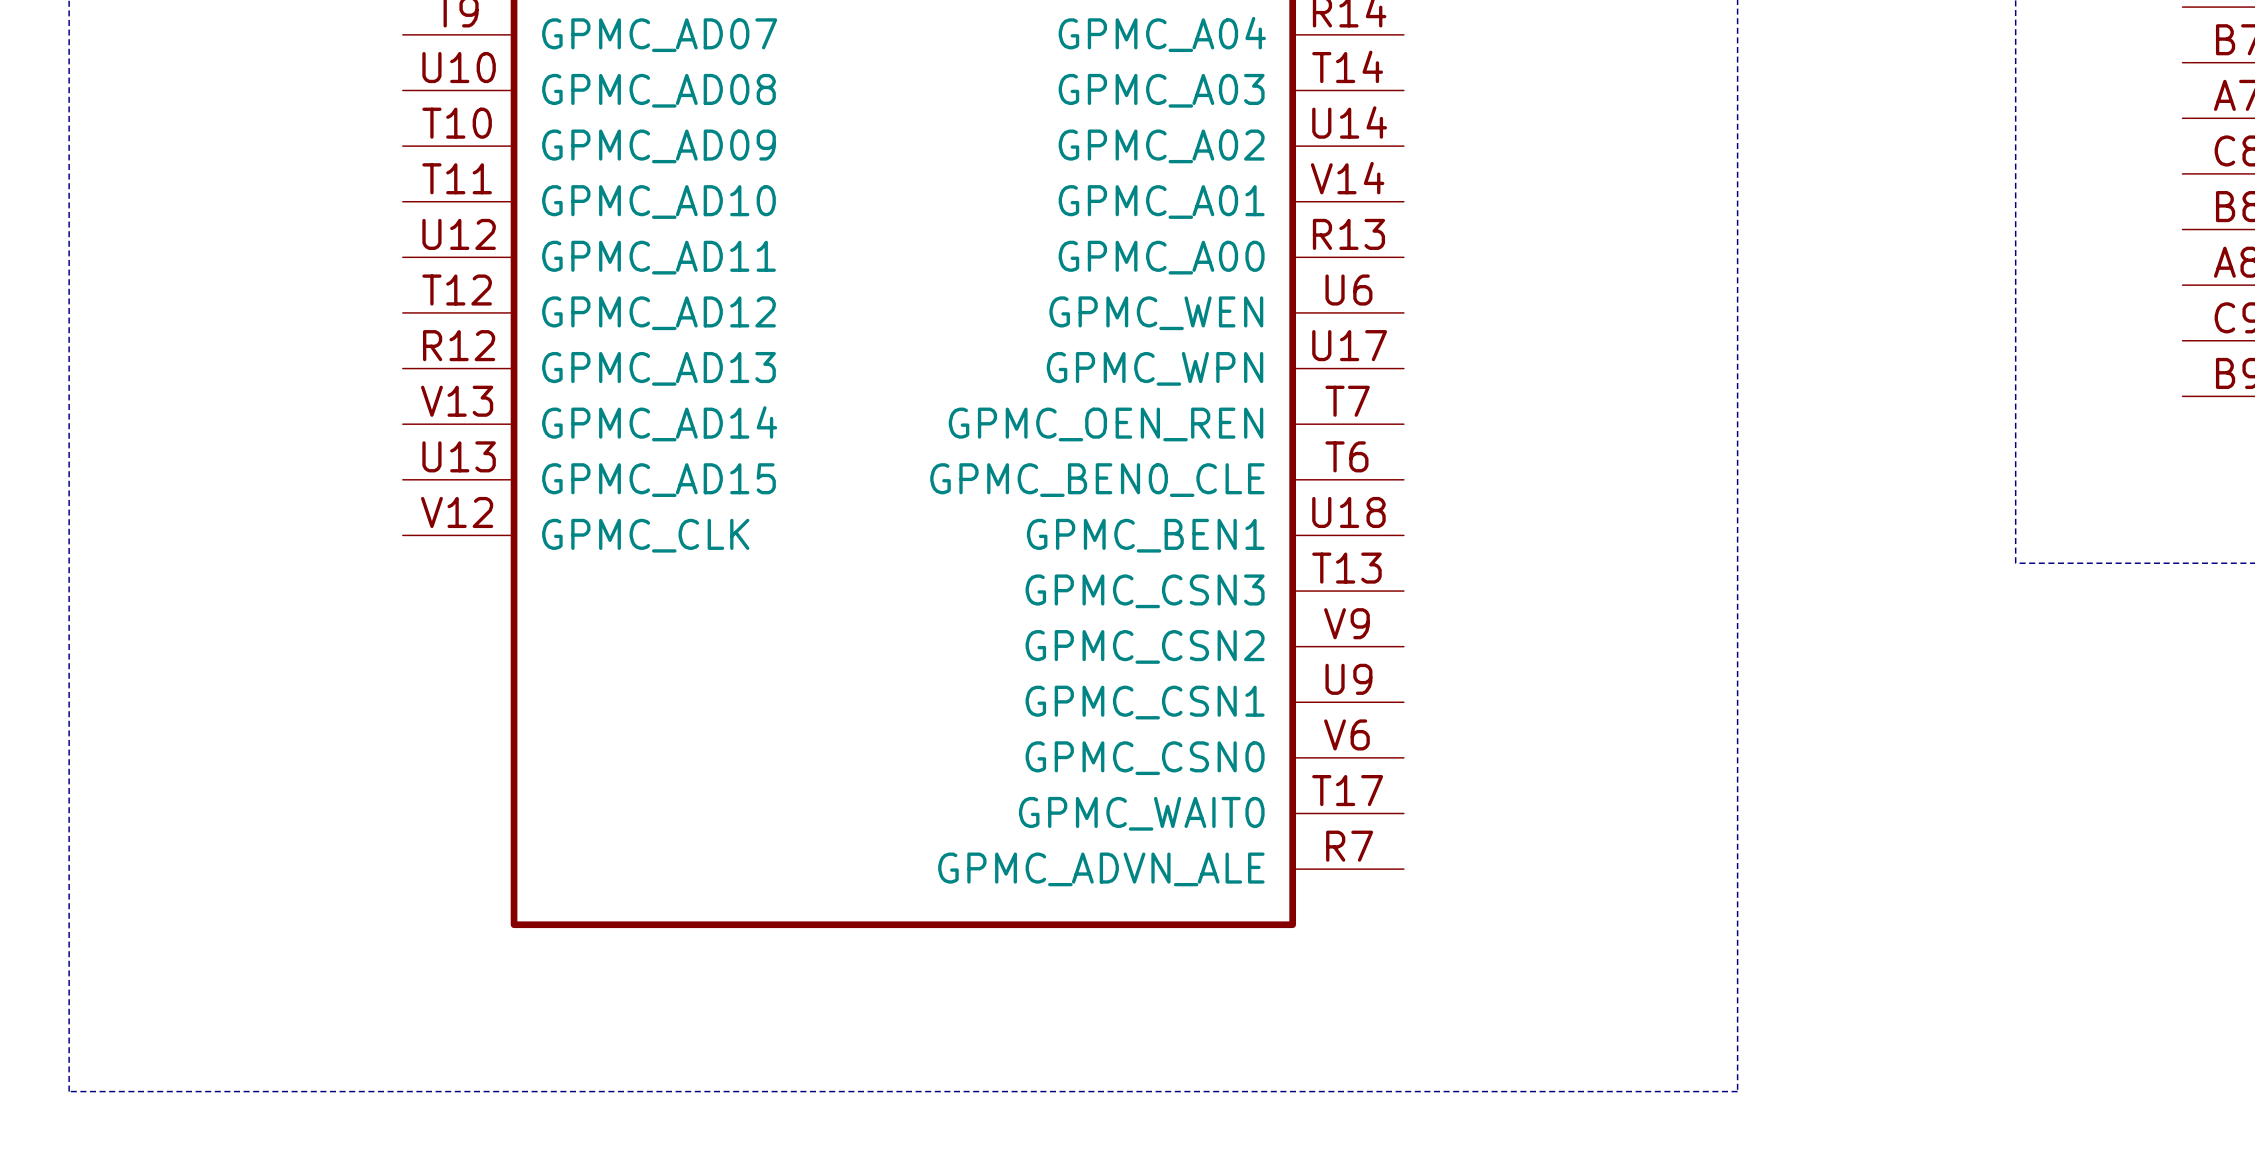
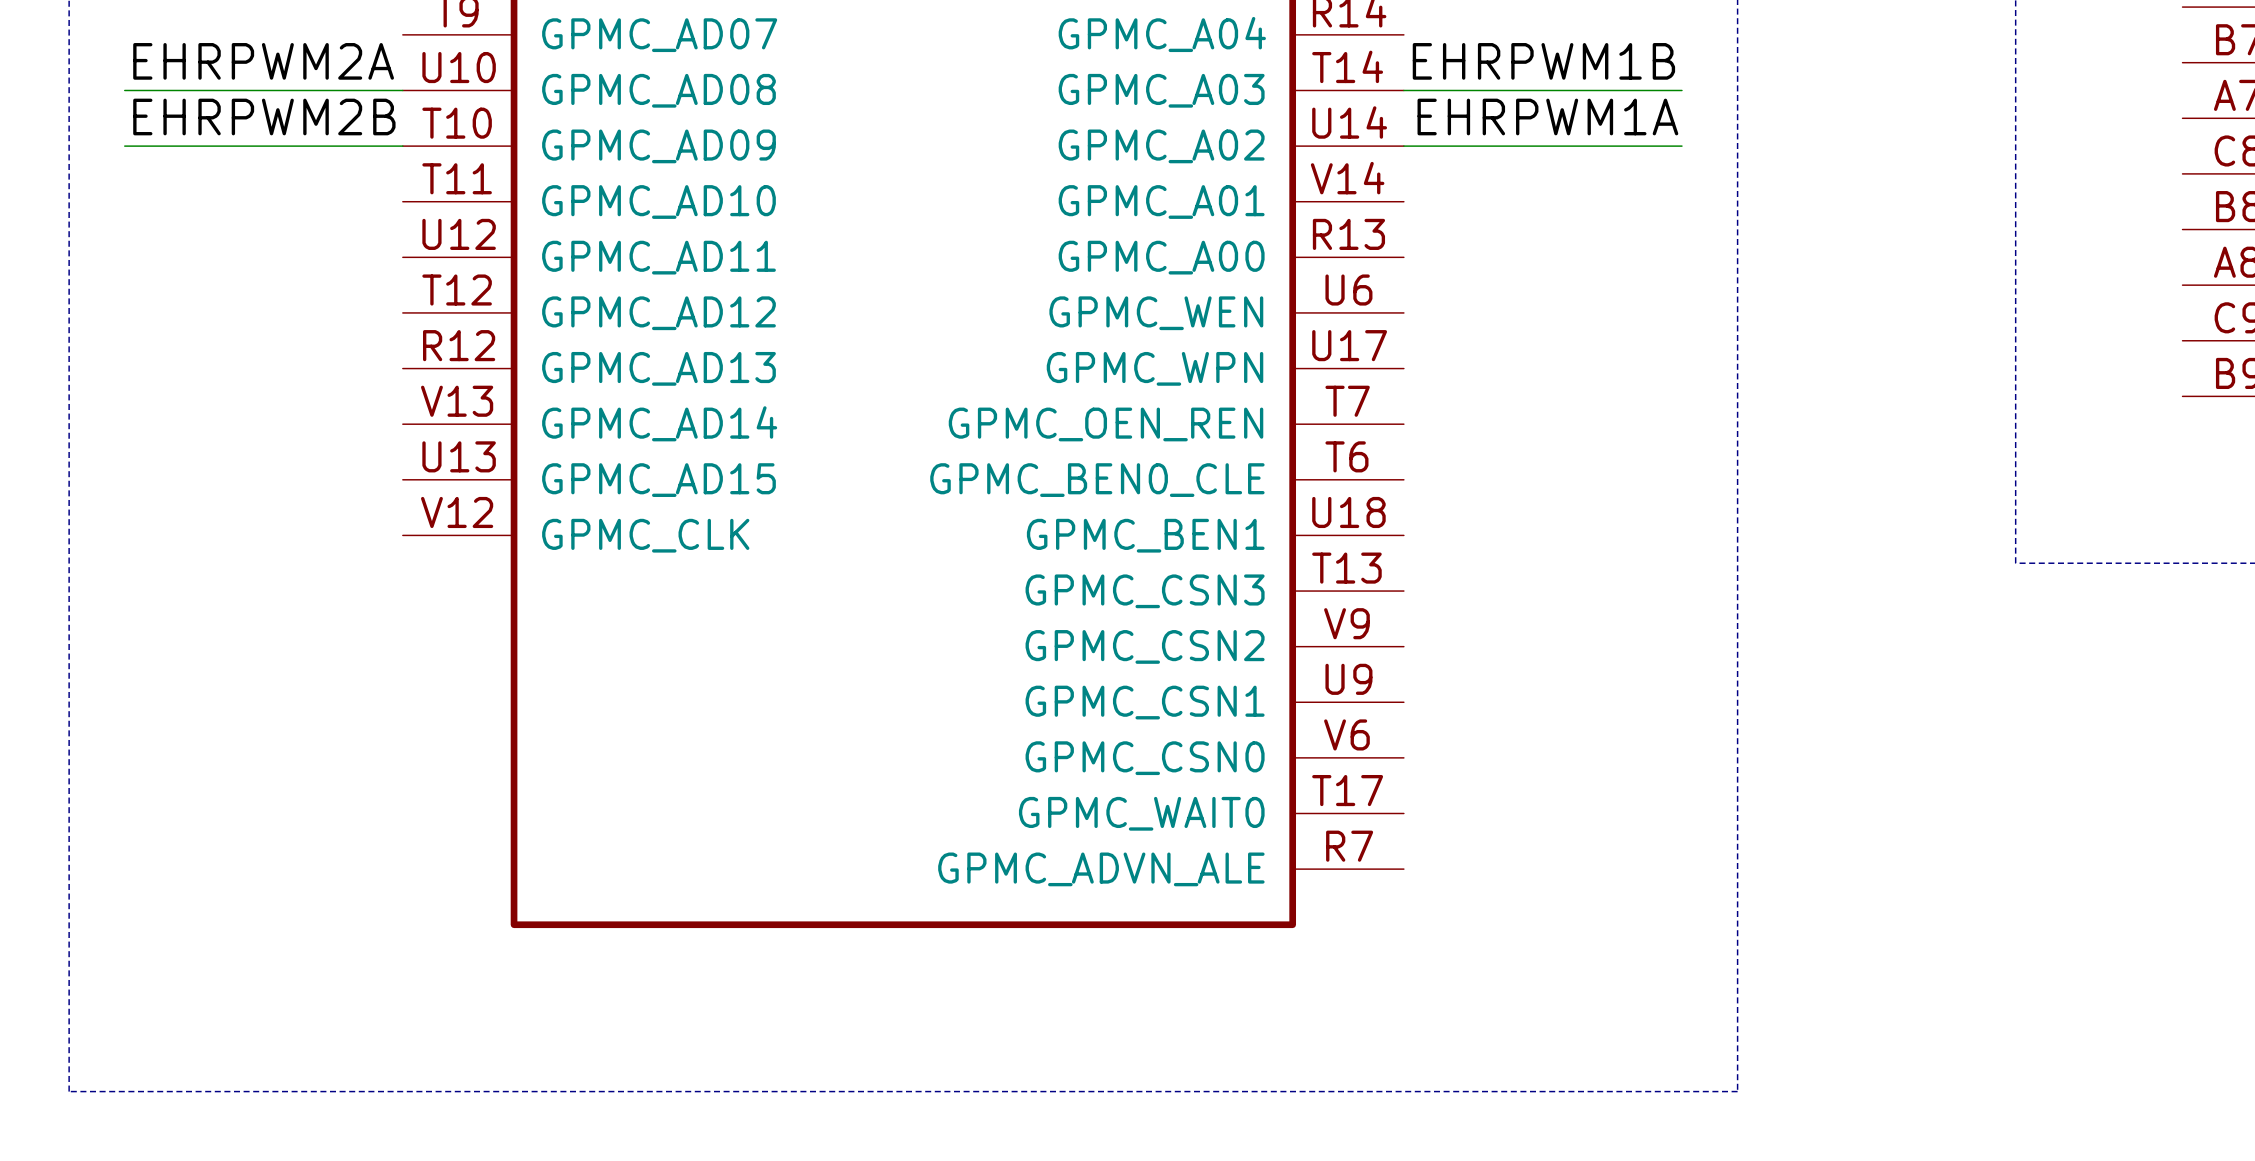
label: none -> EHRPWM2A (263, 61)
label: none -> EHRPWM1B (1543, 61)
wire: none -> (124, 90) (402, 90)
wire: none -> (1403, 90) (1681, 90)
label: none -> EHRPWM2B (264, 116)
label: none -> EHRPWM1A (1547, 116)
wire: none -> (124, 146) (402, 146)
wire: none -> (1403, 146) (1681, 146)

